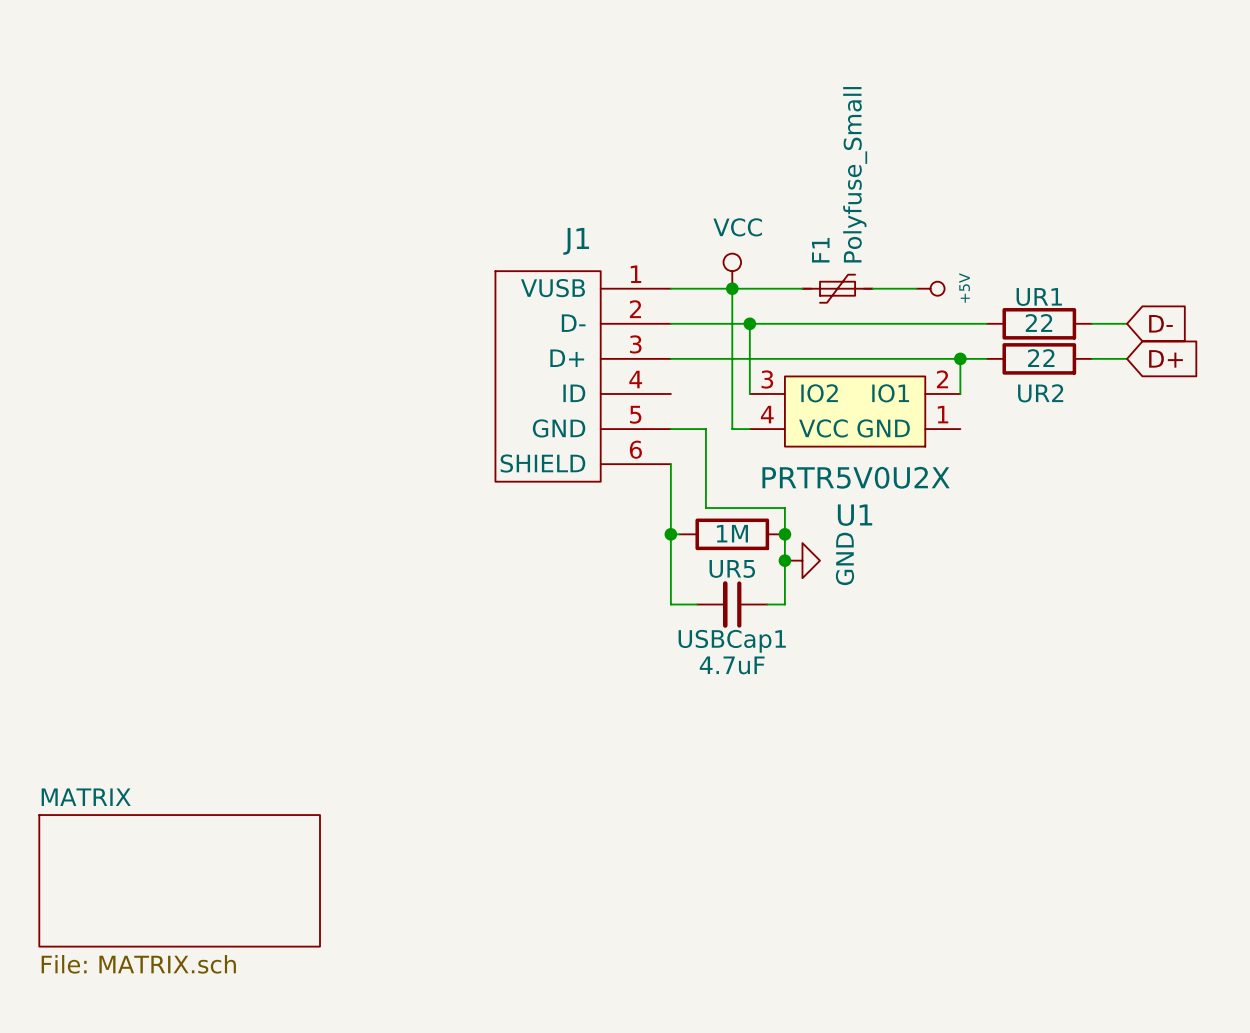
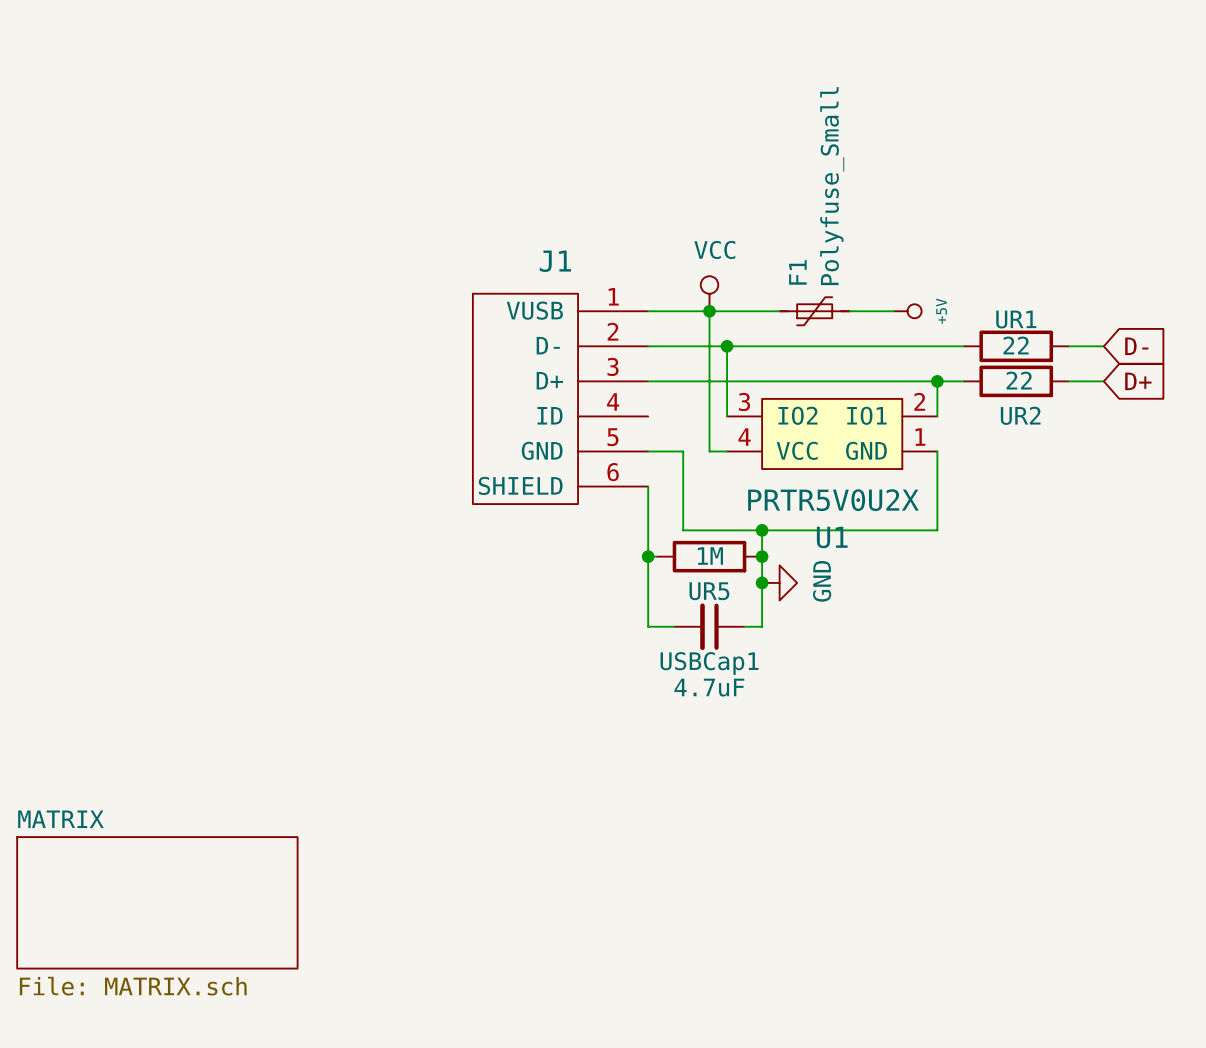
wire: none -> (937, 451) (937, 530) (762, 530)
junction: none -> (762, 530)

